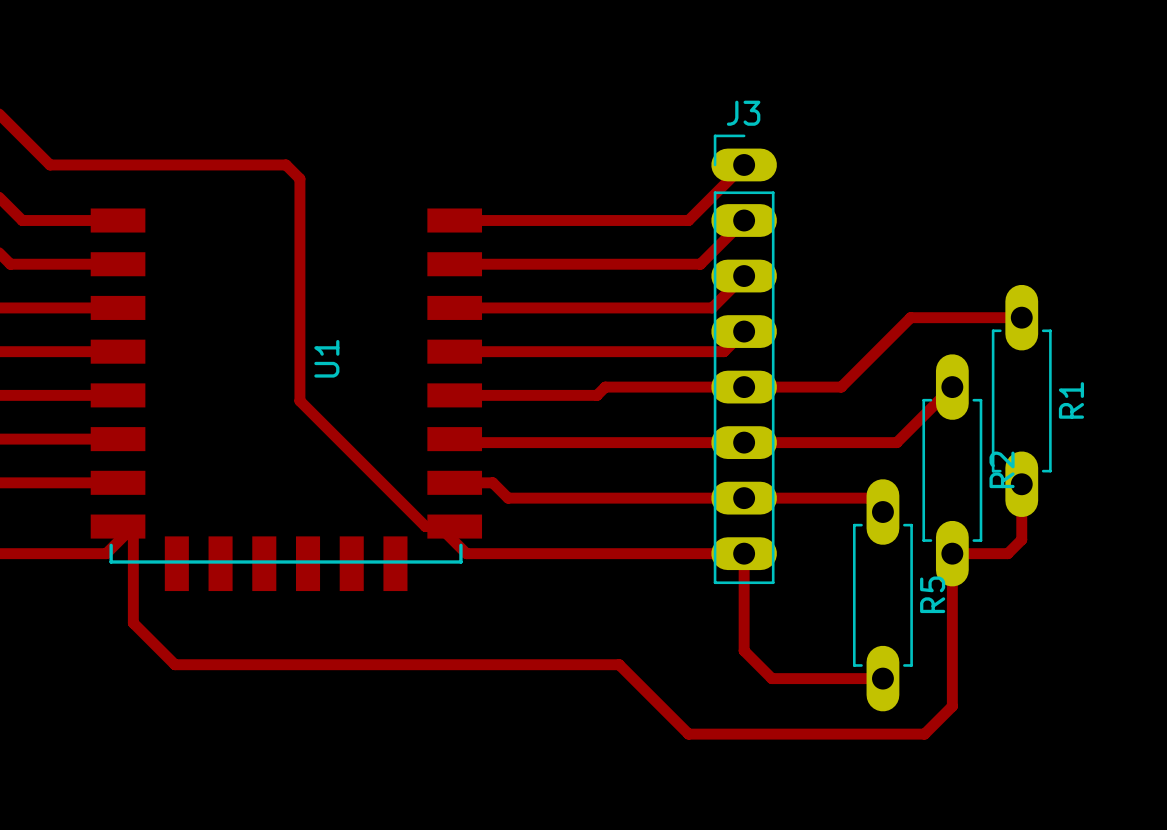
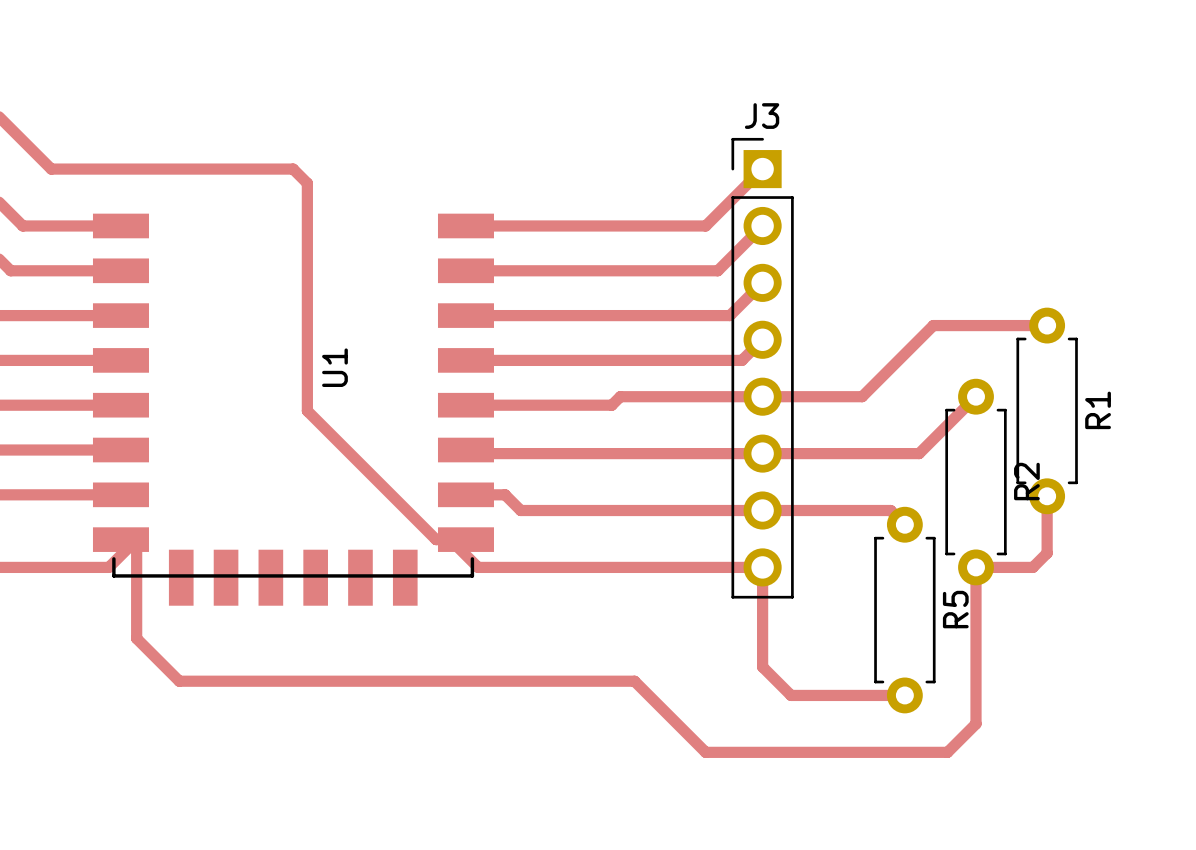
J3 footprint: [711, 134, 777, 585] -> [731, 137, 794, 599]
R1 footprint: [991, 284, 1052, 518] -> [1016, 307, 1078, 515]
R2 footprint: [922, 354, 983, 587] -> [945, 378, 1007, 586]
R5 footprint: [853, 479, 913, 712] -> [874, 506, 936, 714]

